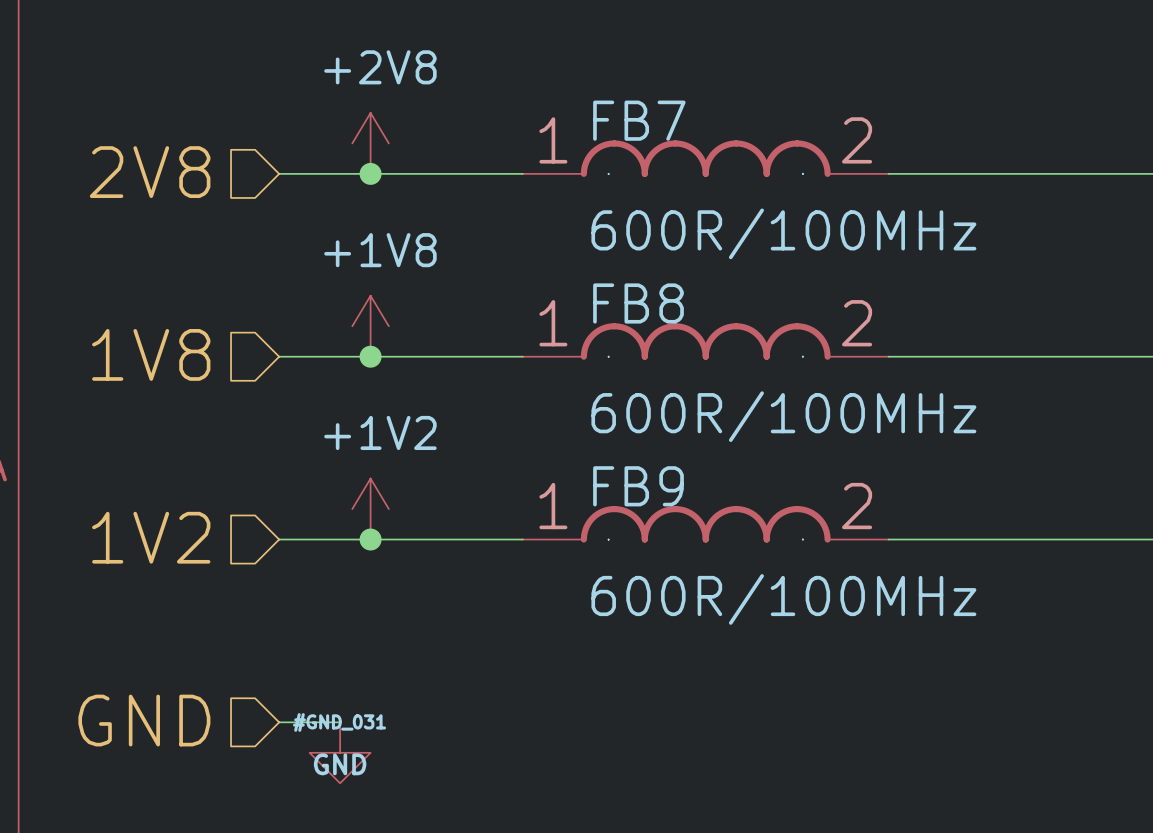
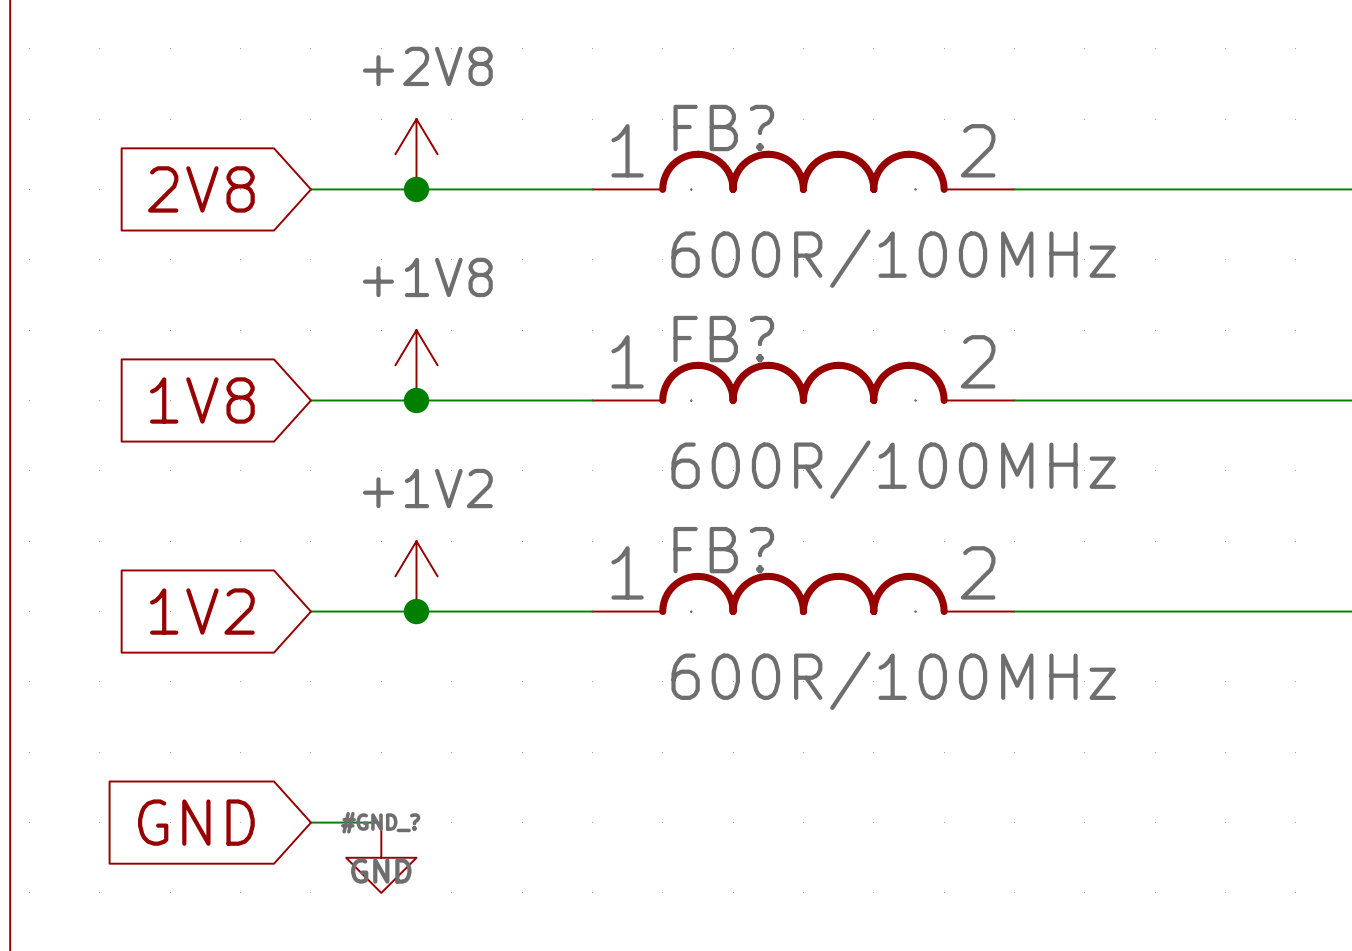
FB7 name: FB7 (639, 120) -> FB? (723, 127)
hierarchical label: 2V8 (150, 172) -> none
global label: none -> 2V8 (201, 189)
FB8 name: FB8 (638, 303) -> FB? (723, 339)
hierarchical label: 1V8 (151, 354) -> none
global label: none -> 1V8 (202, 400)
FB9 name: FB9 (638, 486) -> FB? (723, 550)
hierarchical label: 1V2 (151, 537) -> none
global label: none -> 1V2 (202, 611)
hierarchical label: GND (144, 720) -> none
global label: none -> GND (196, 822)
#GND_031 name: #GND_031 (339, 722) -> #GND_? (380, 822)

